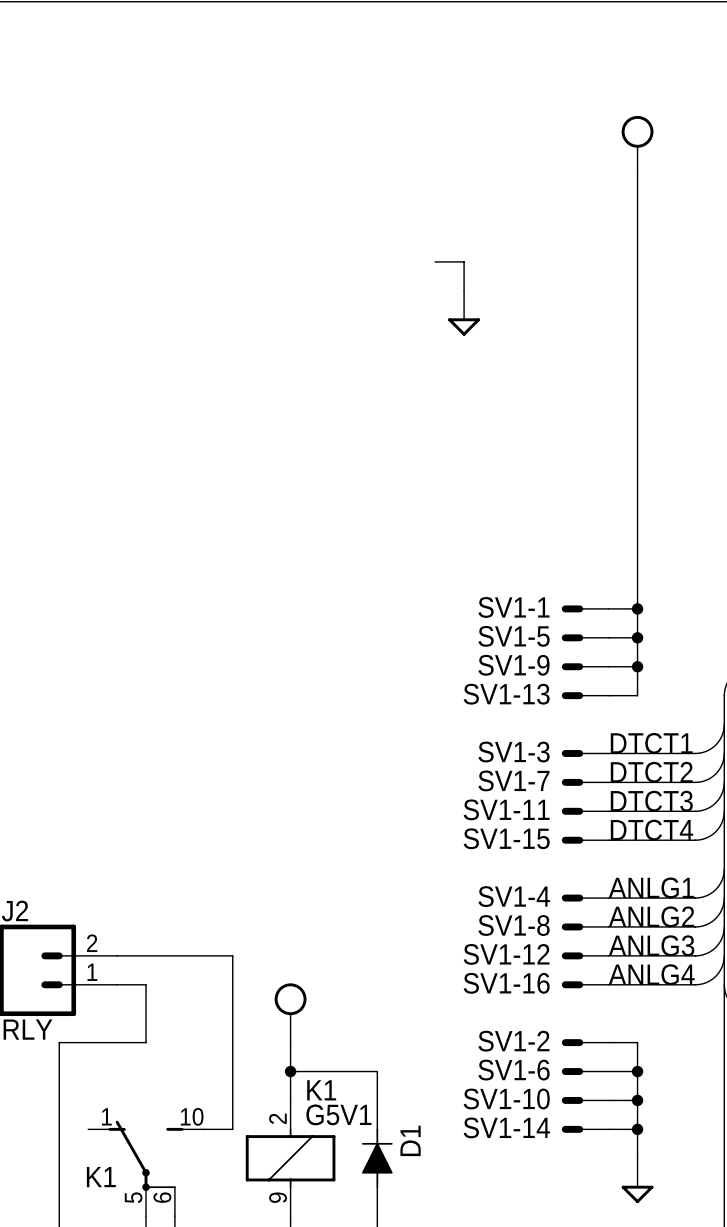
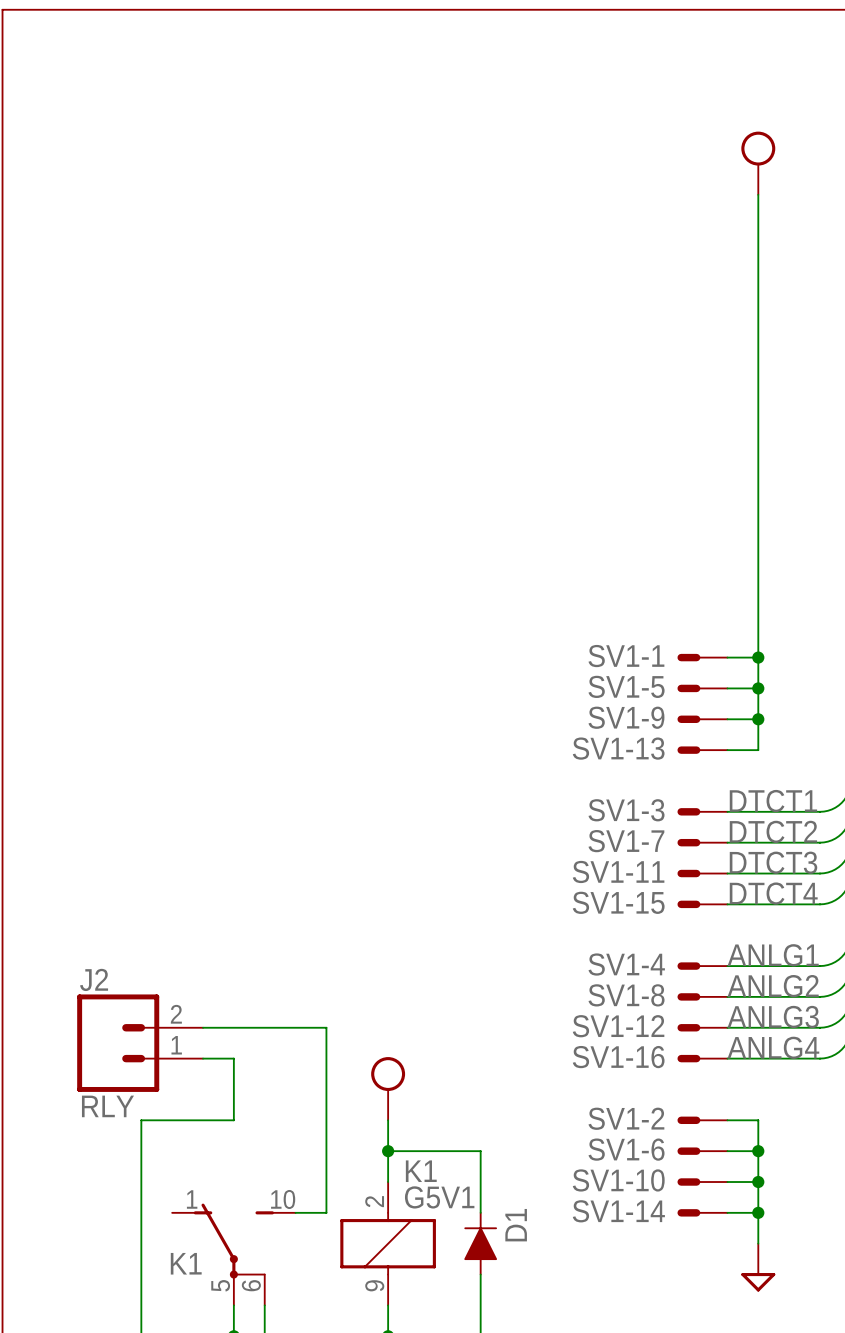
wire: (435, 261) (464, 261) (464, 290) -> none
power symbol: (464, 313) -> none

